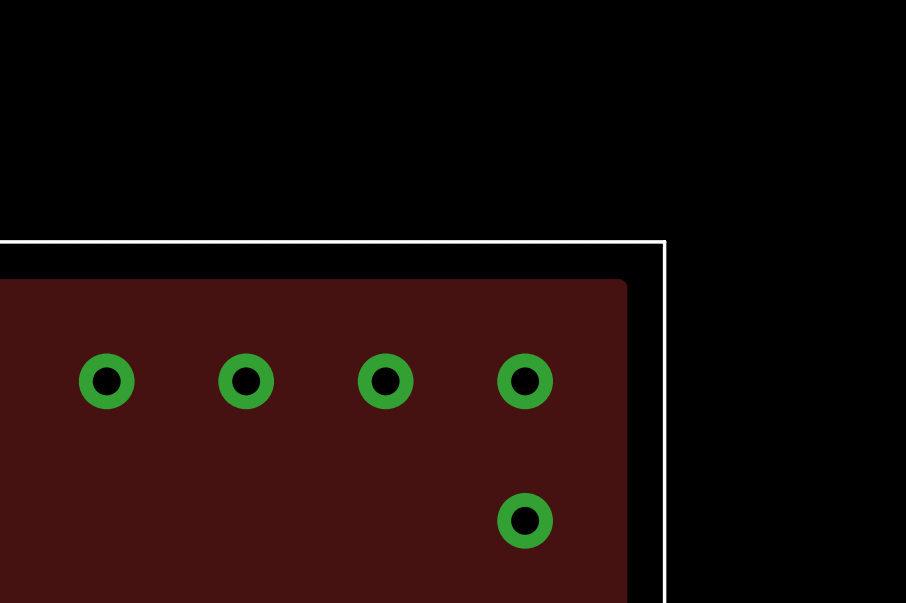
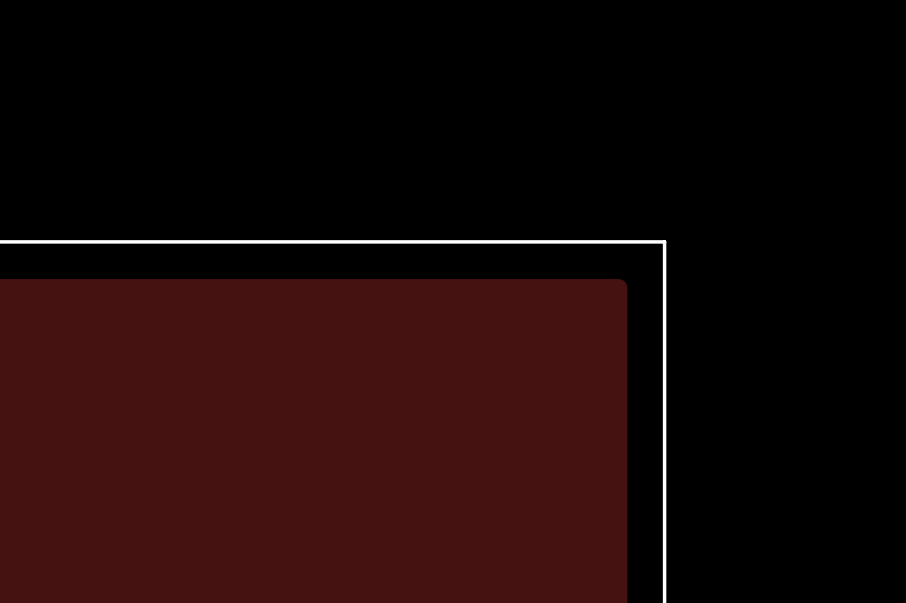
via: (106, 381) -> none
via: (246, 381) -> none
via: (385, 381) -> none
via: (525, 381) -> none
via: (525, 520) -> none

